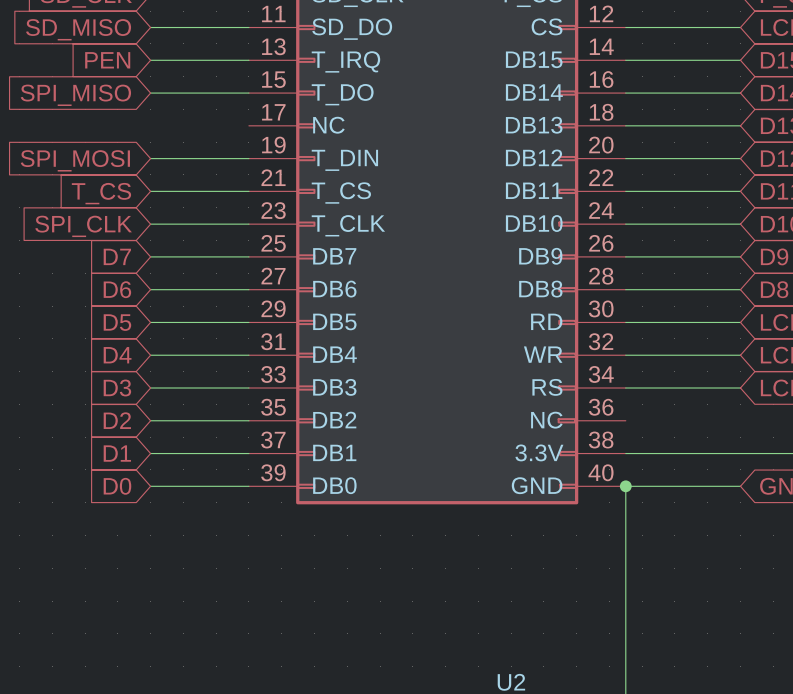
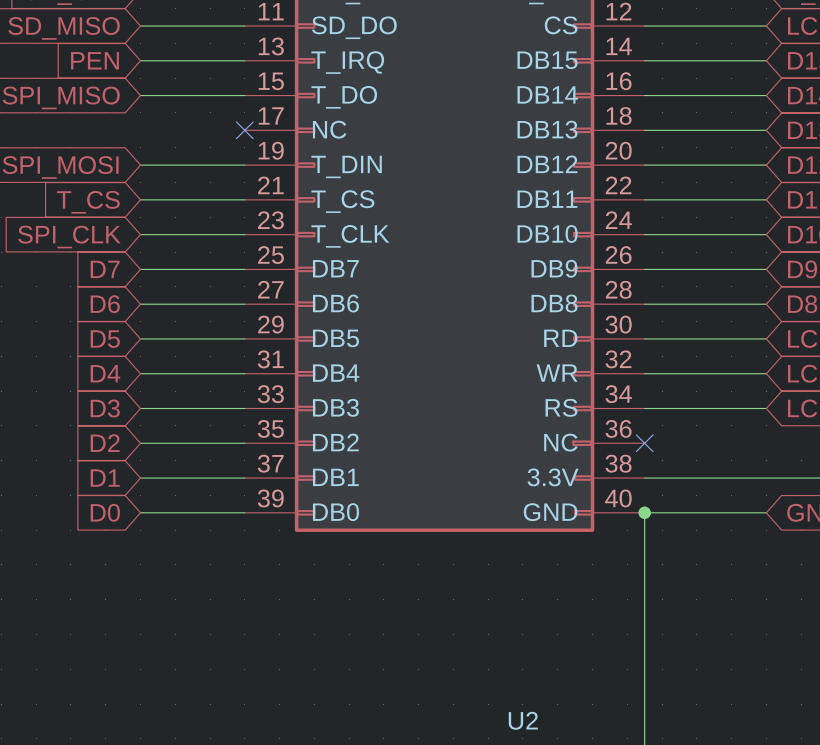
no-connect mark: none -> (244, 130)
no-connect mark: none -> (644, 443)

